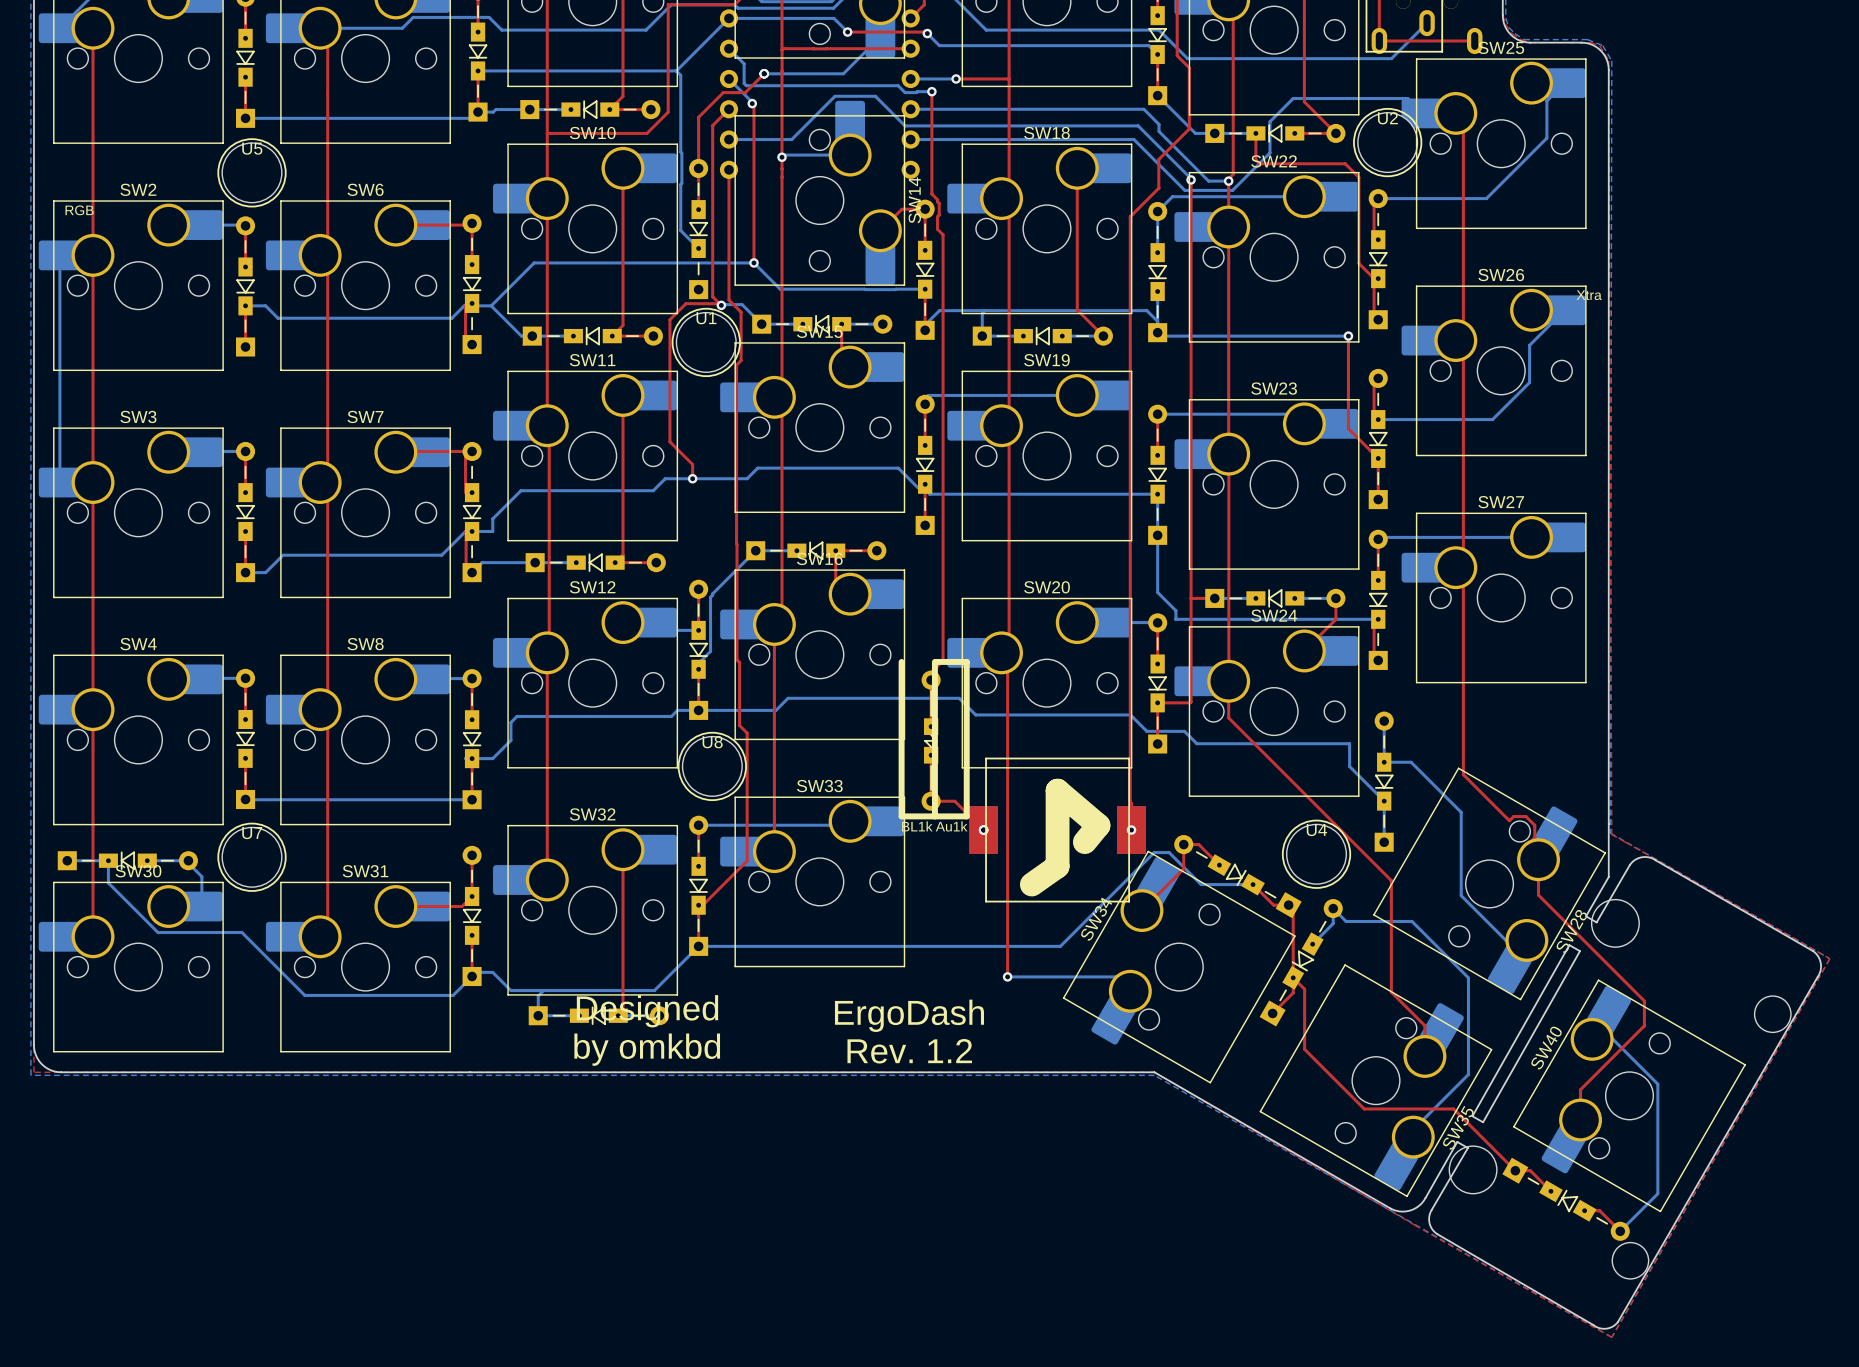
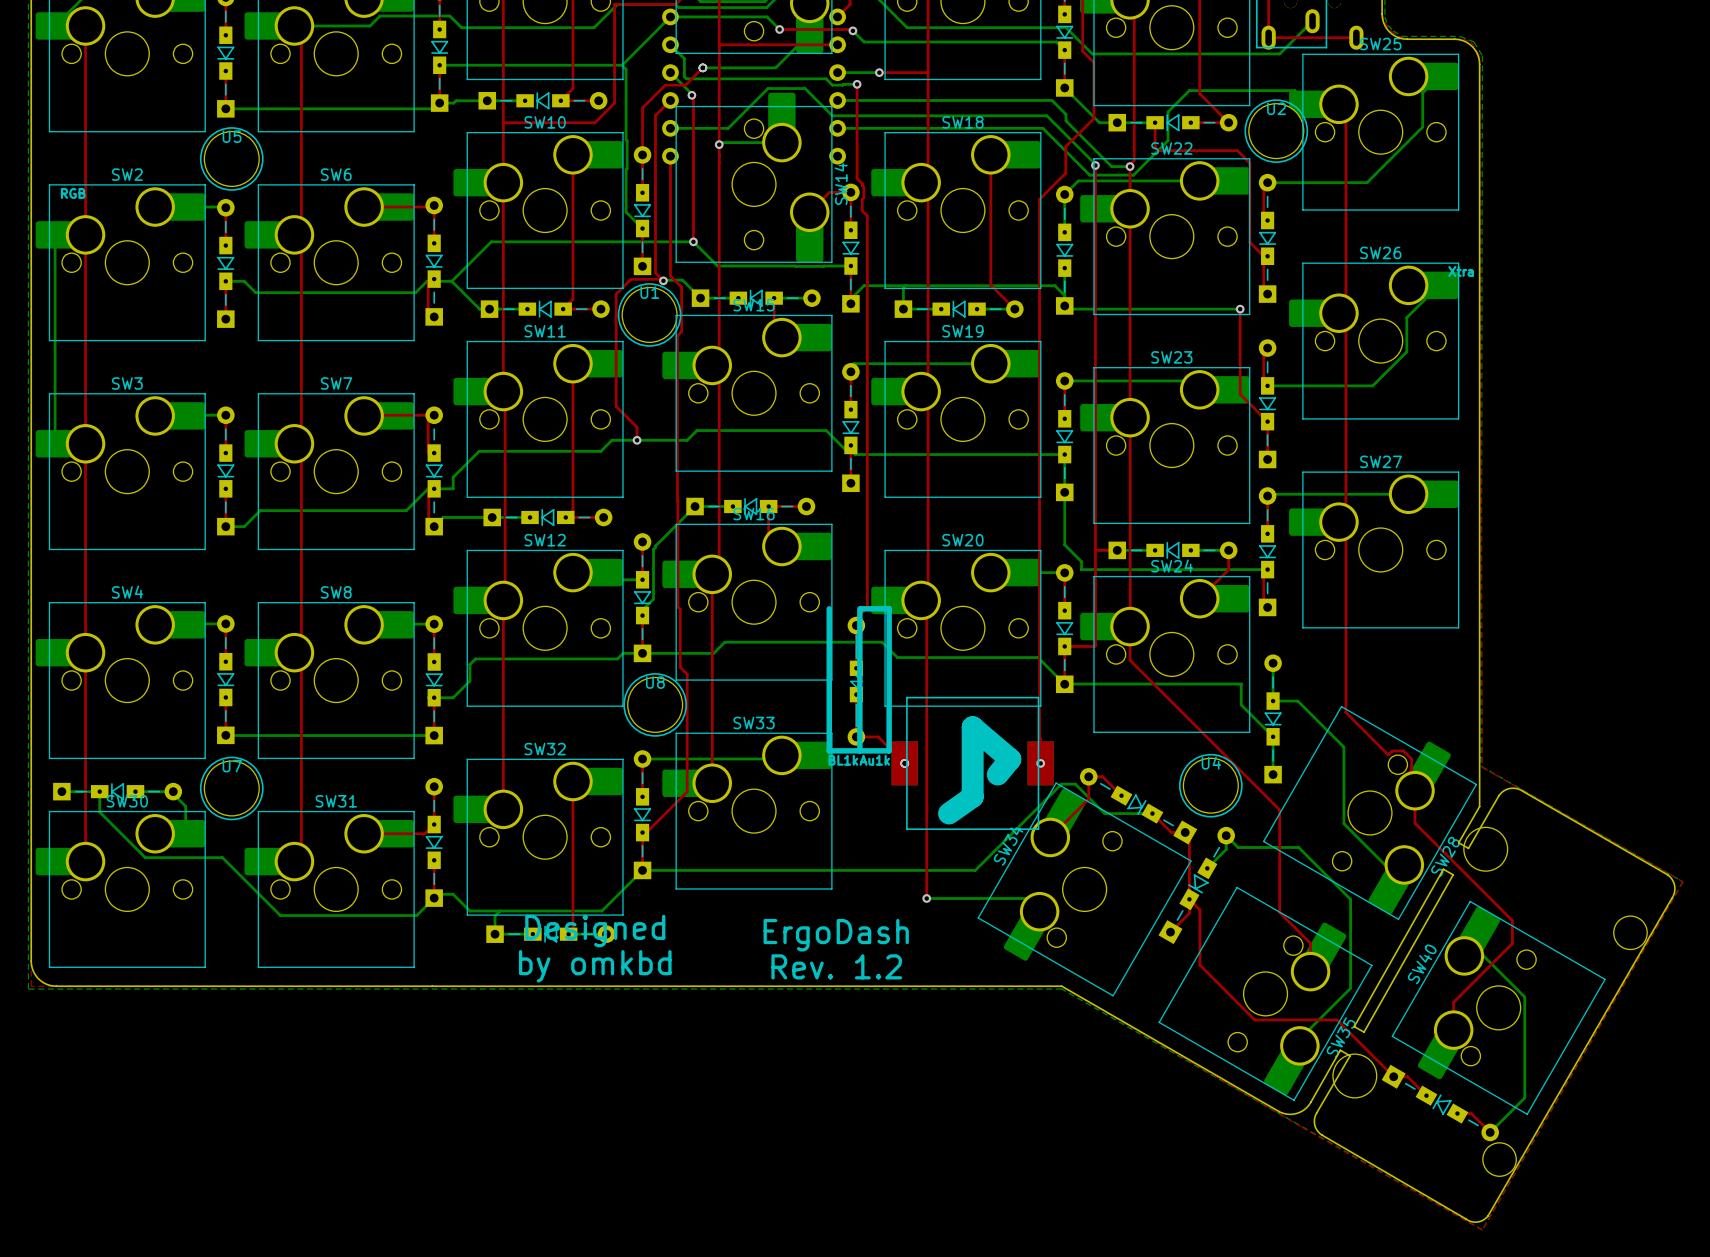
top track: none -> (642, 228) (642, 266)
bottom track: (1128, 714) (1146, 731) (1184, 731) (1196, 743) -> (1038, 657) (1064, 684)
bottom track: none -> (1100, 684) (1064, 684)

